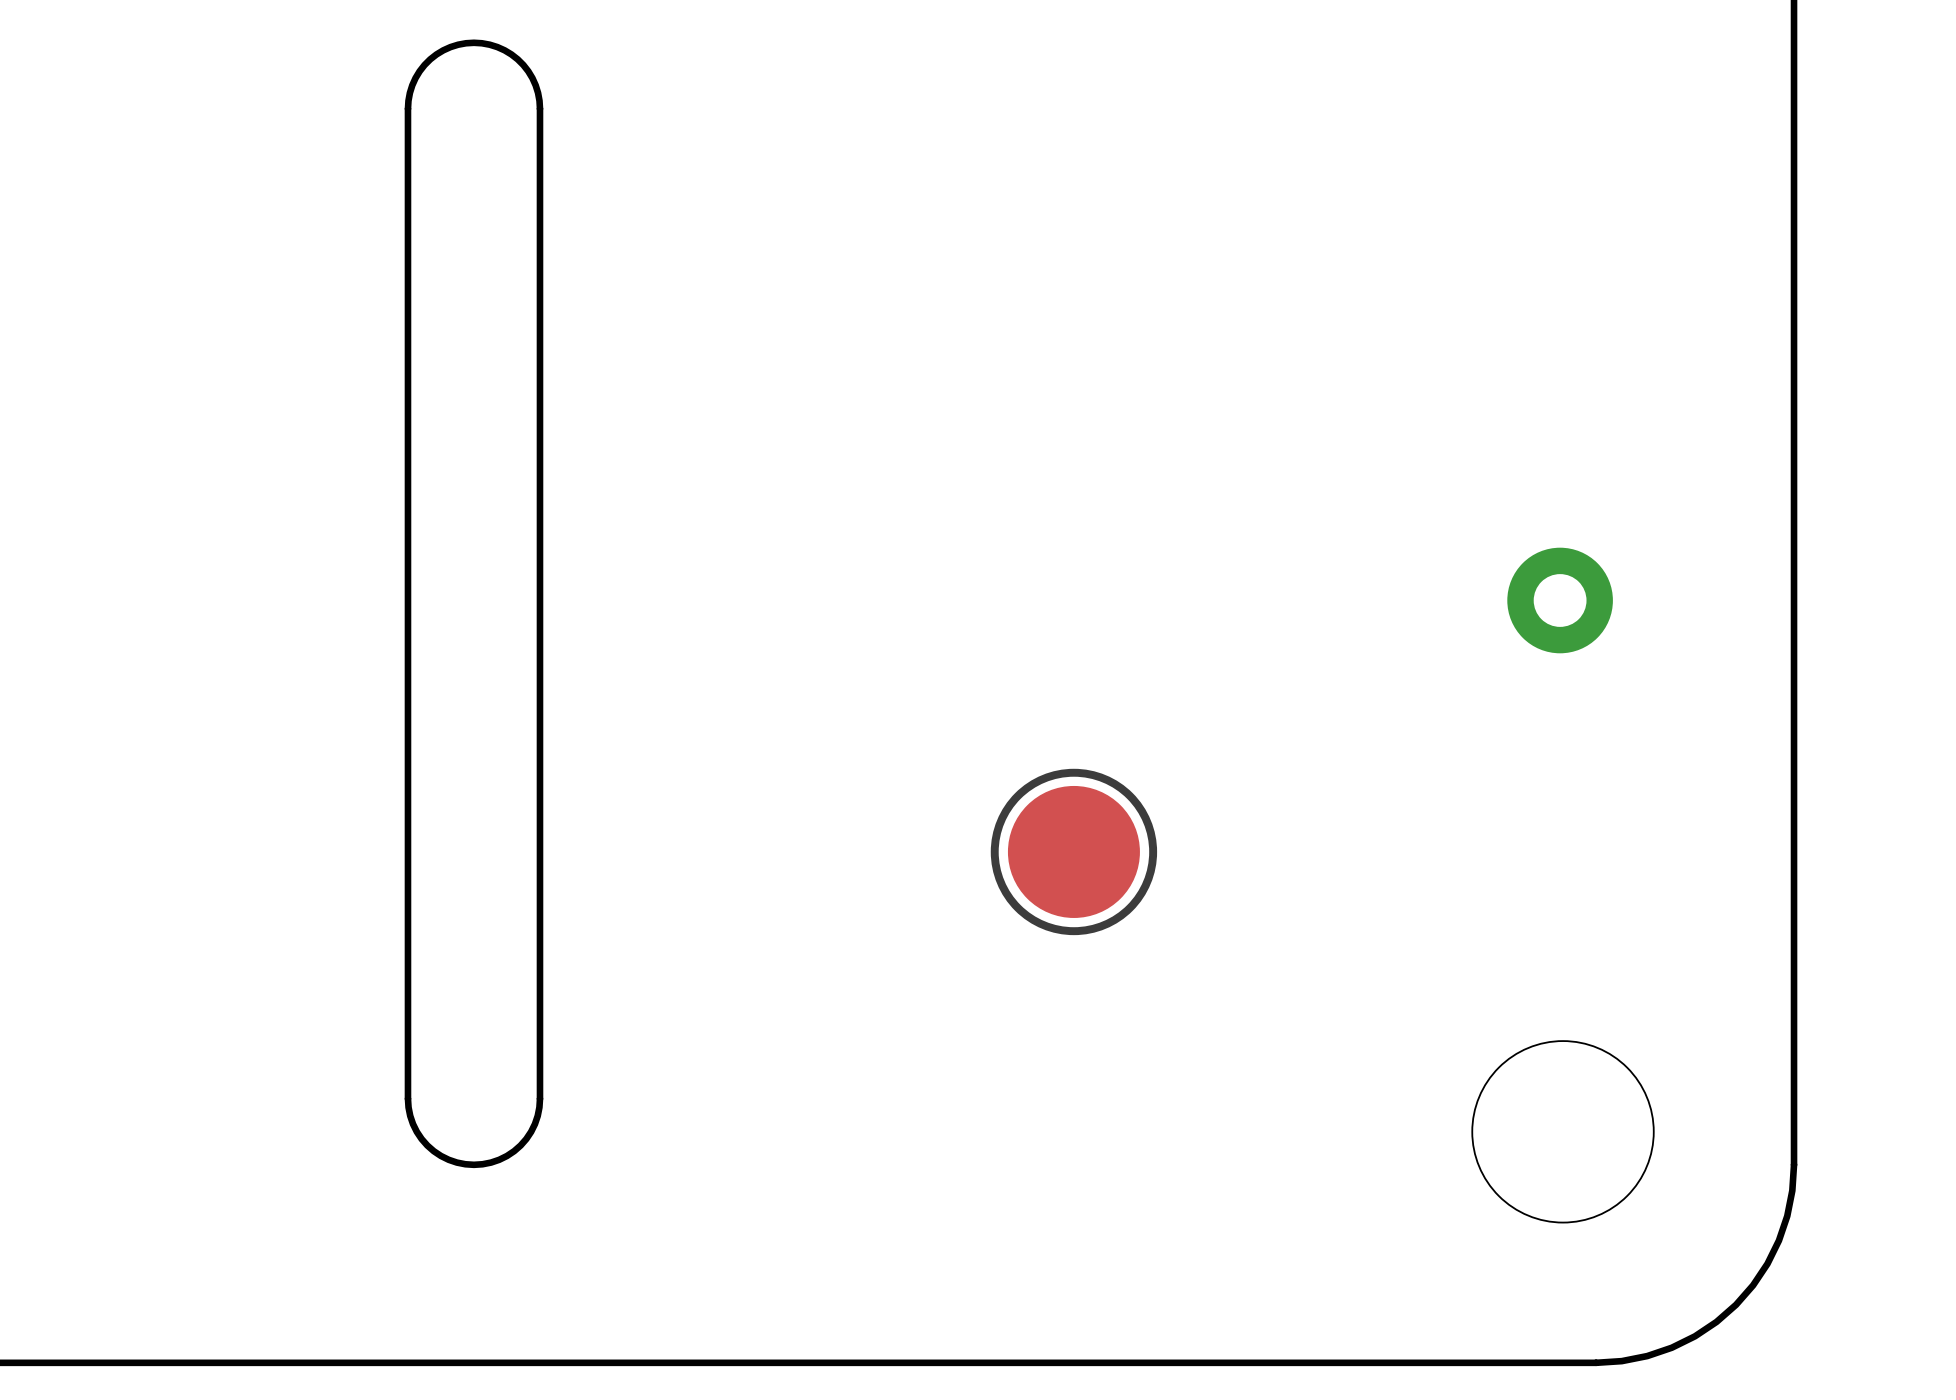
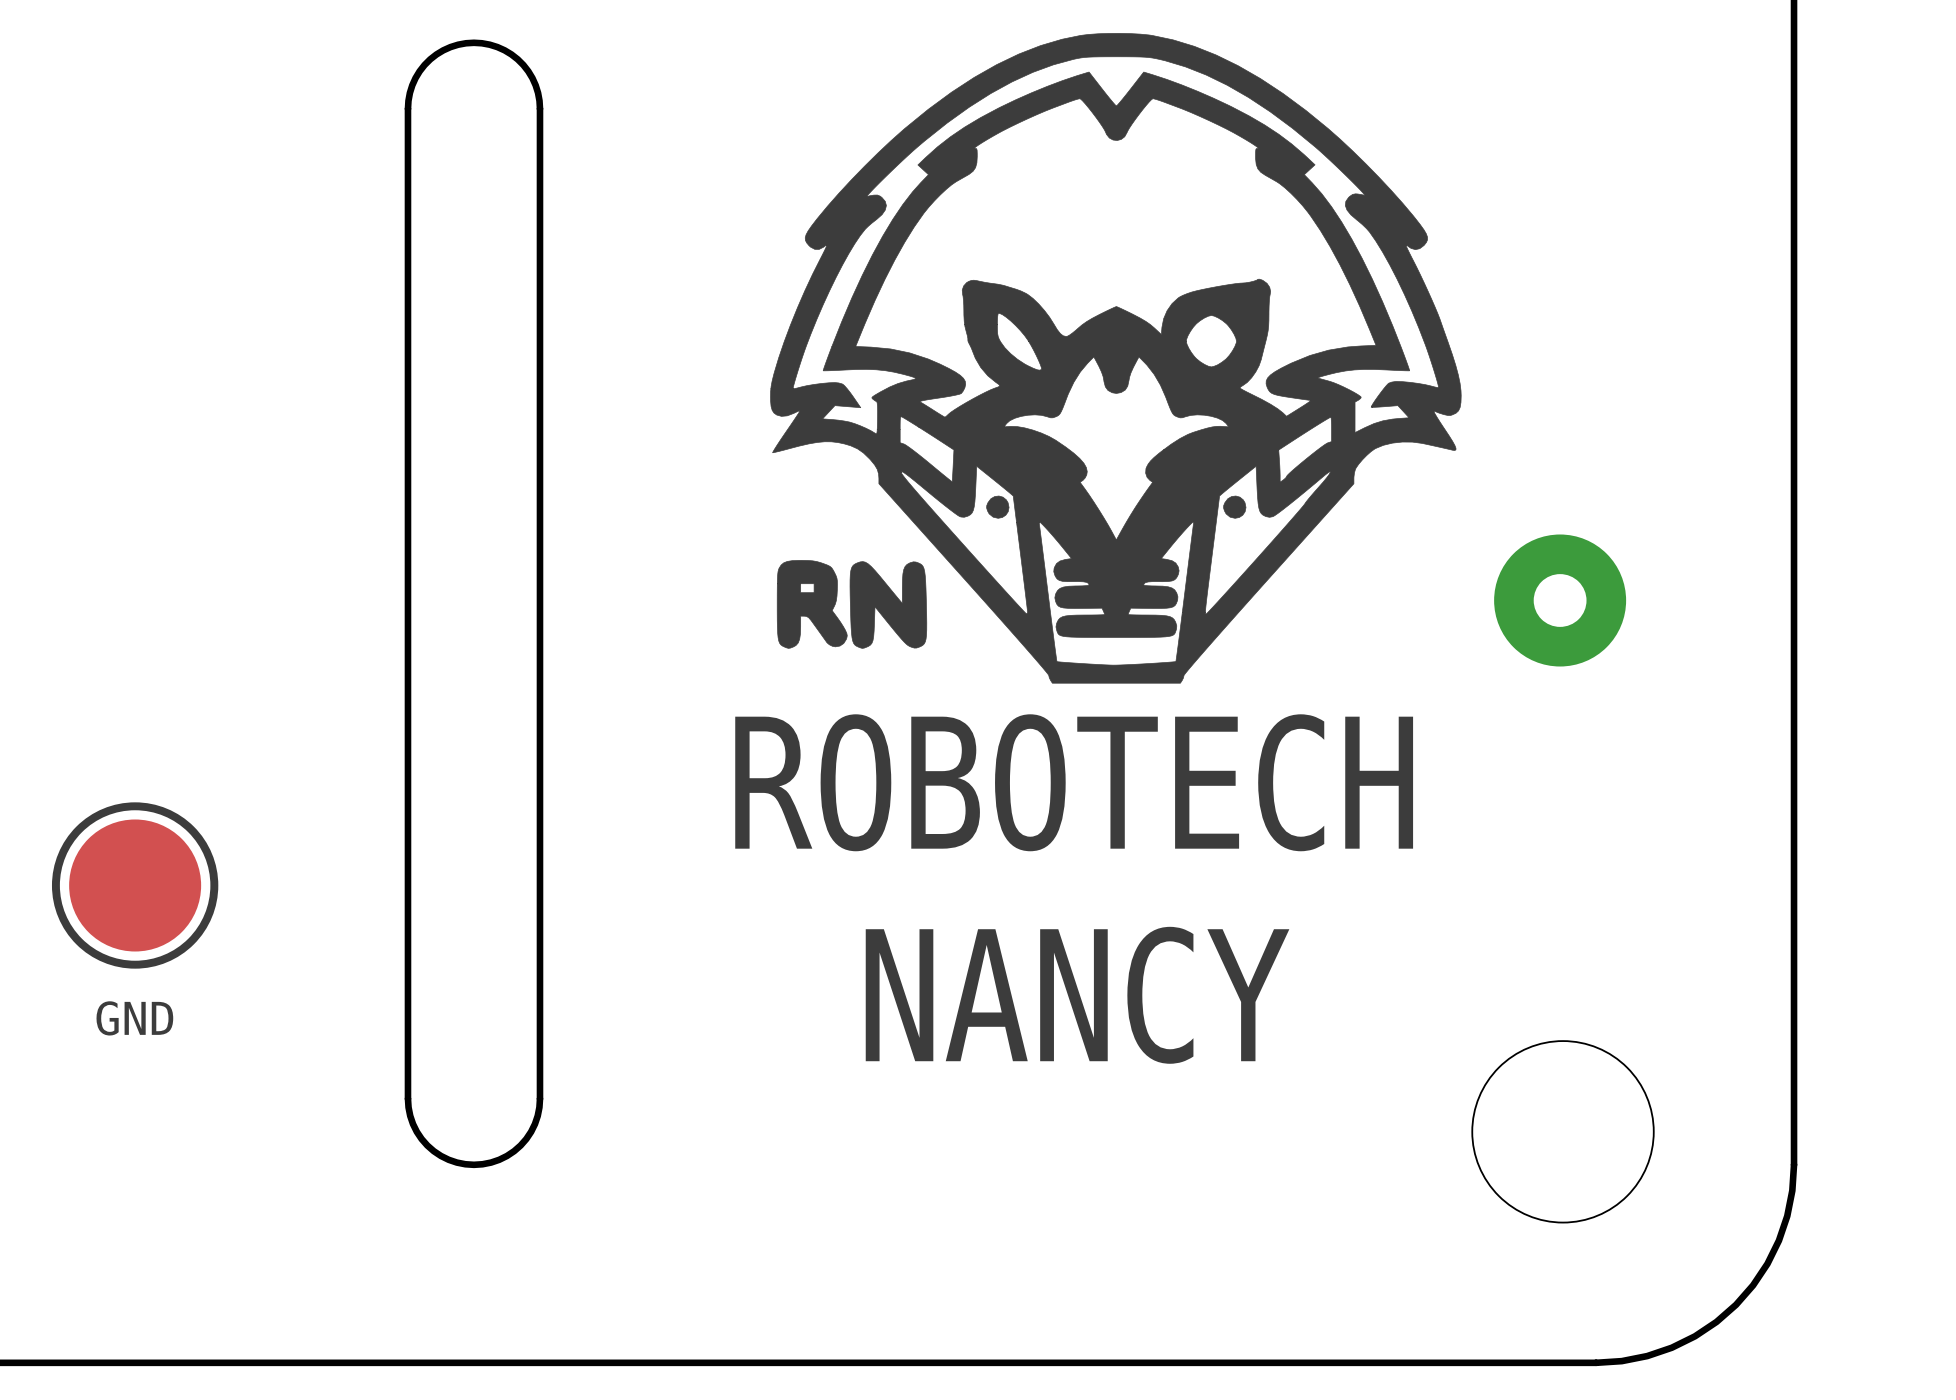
drawing: none -> [770, 33, 1462, 684]
via size: [1507, 547, 1613, 654] -> [1494, 534, 1627, 667]
text: none -> ROBOTECH (1074, 782)
part position: (1073, 851) -> (135, 885)
text: none -> NANCY (1077, 995)
text: none -> GND (134, 1018)

